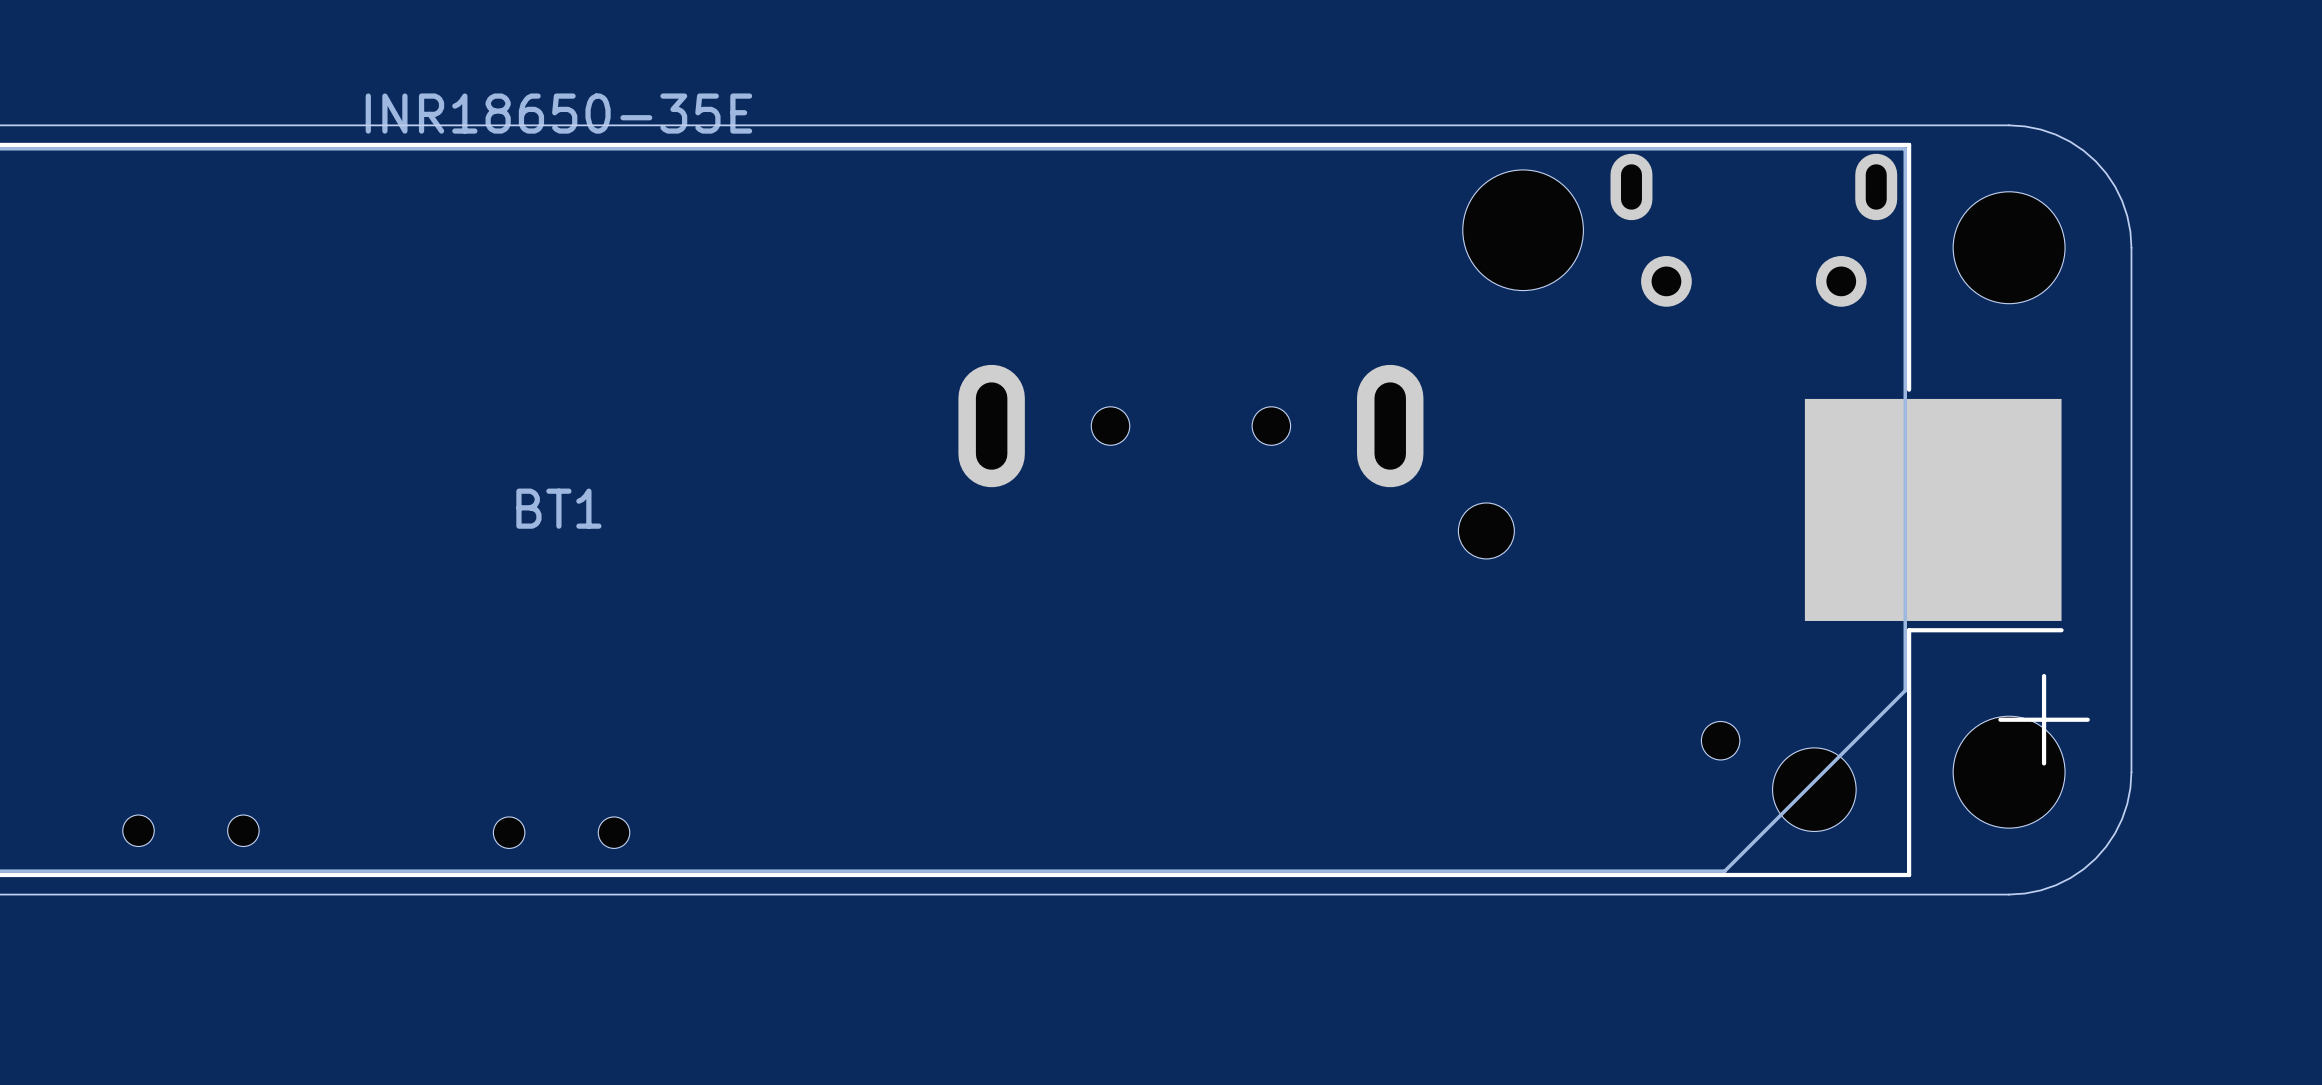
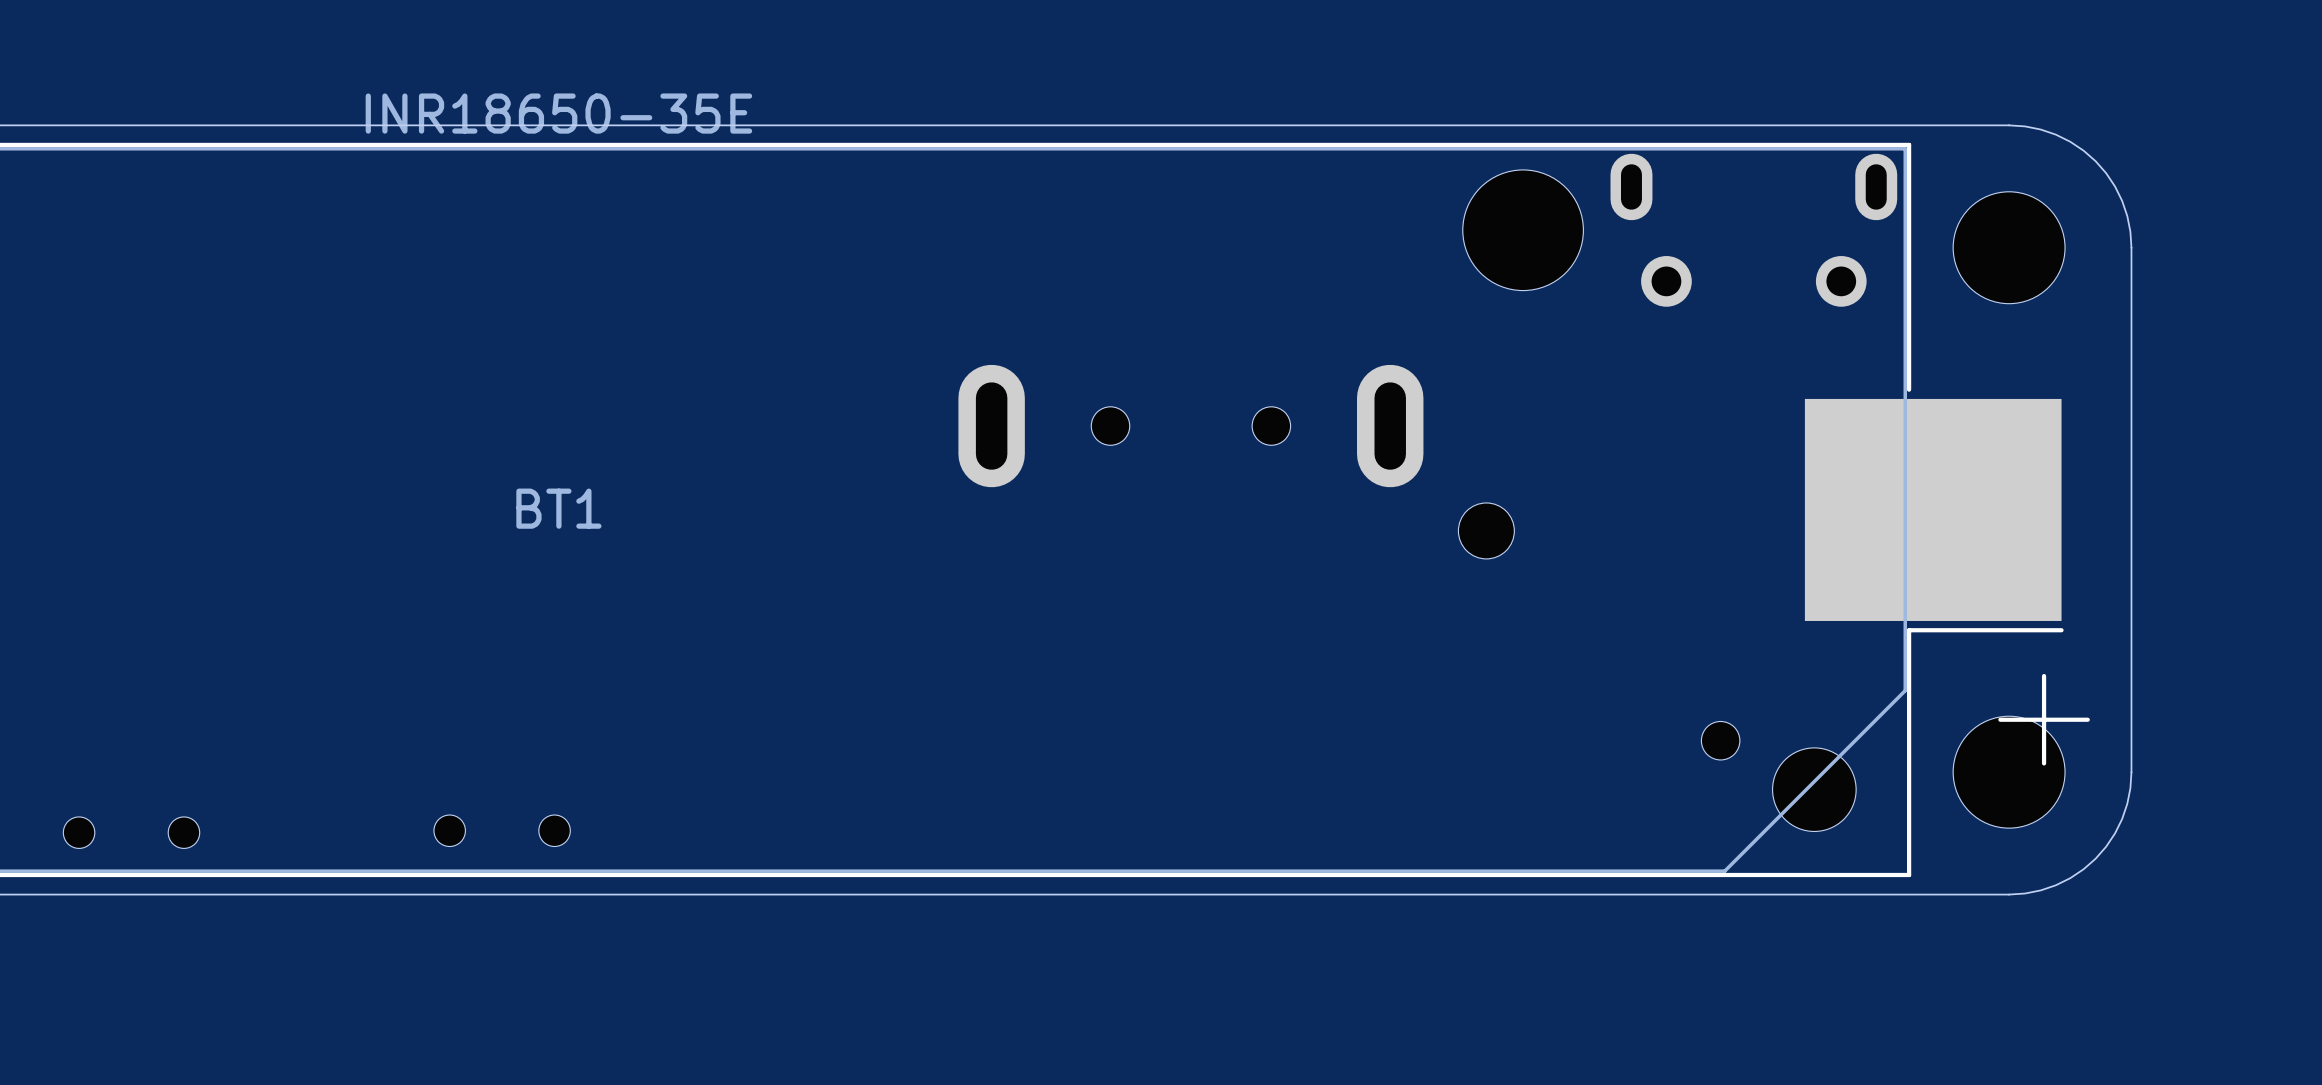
part position: (190, 830) -> (131, 832)
part position: (561, 832) -> (502, 830)

